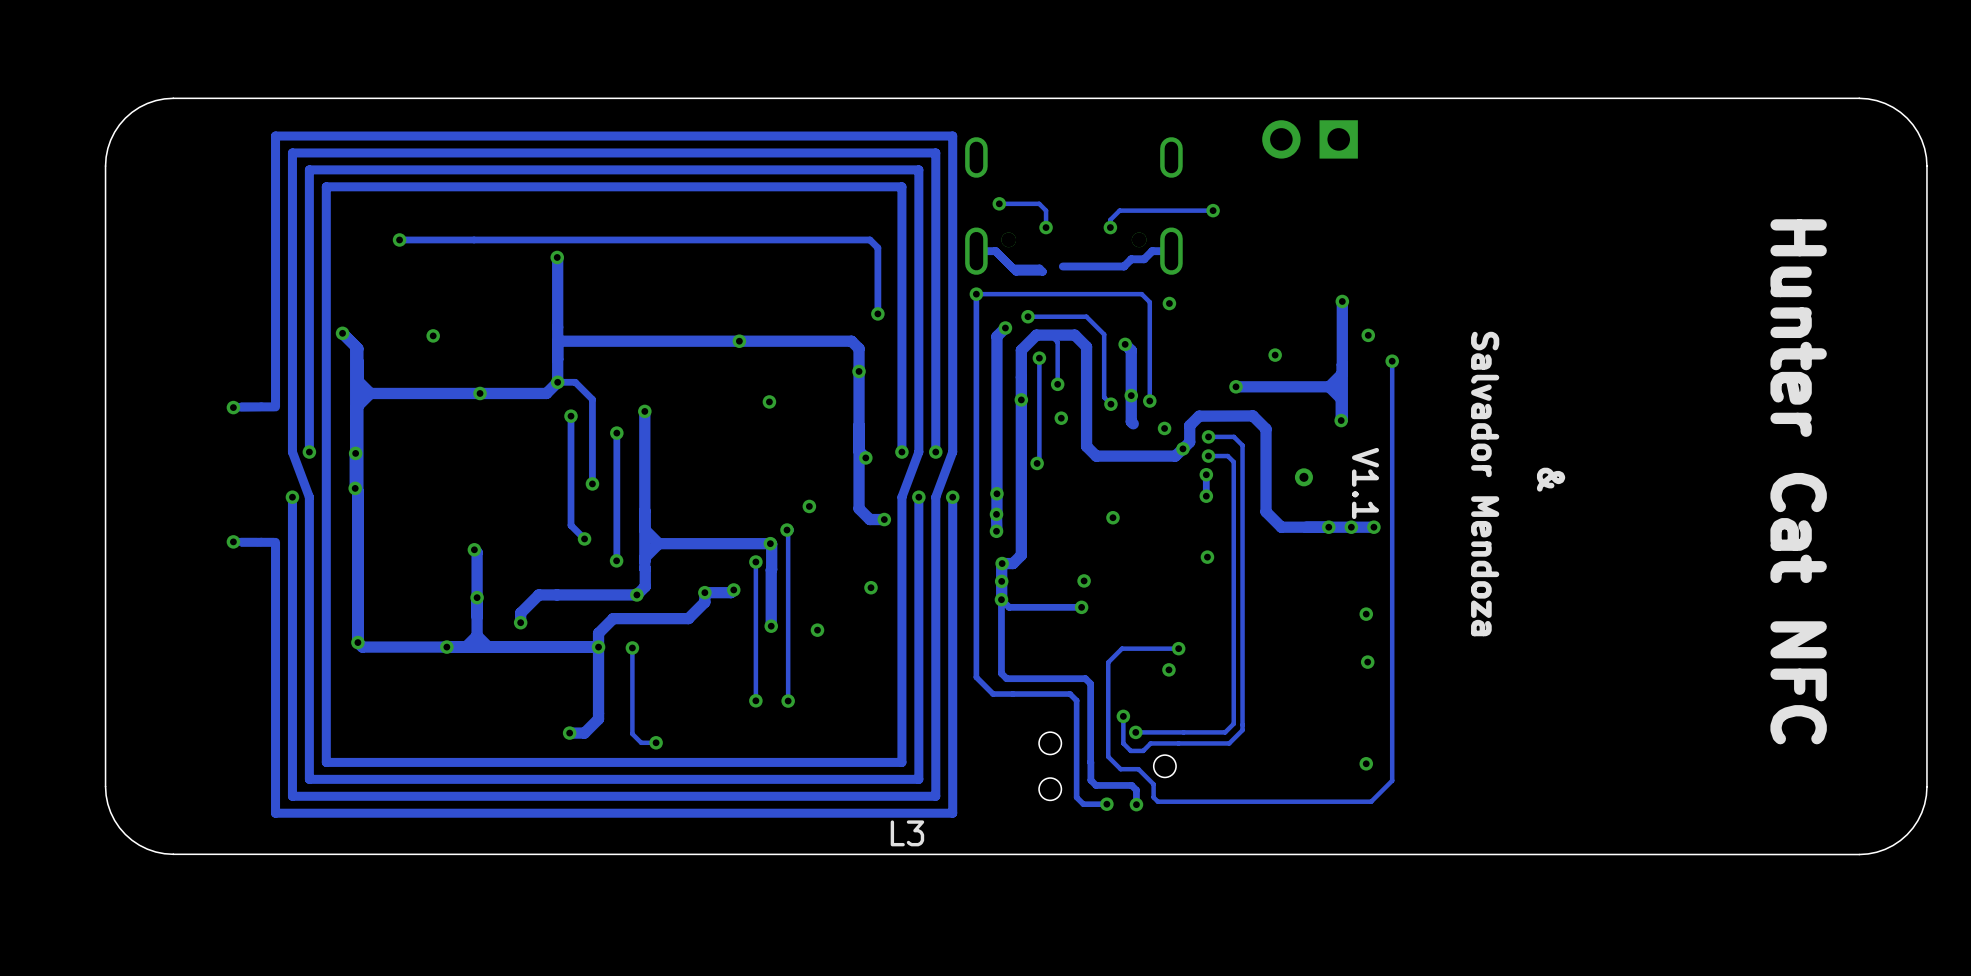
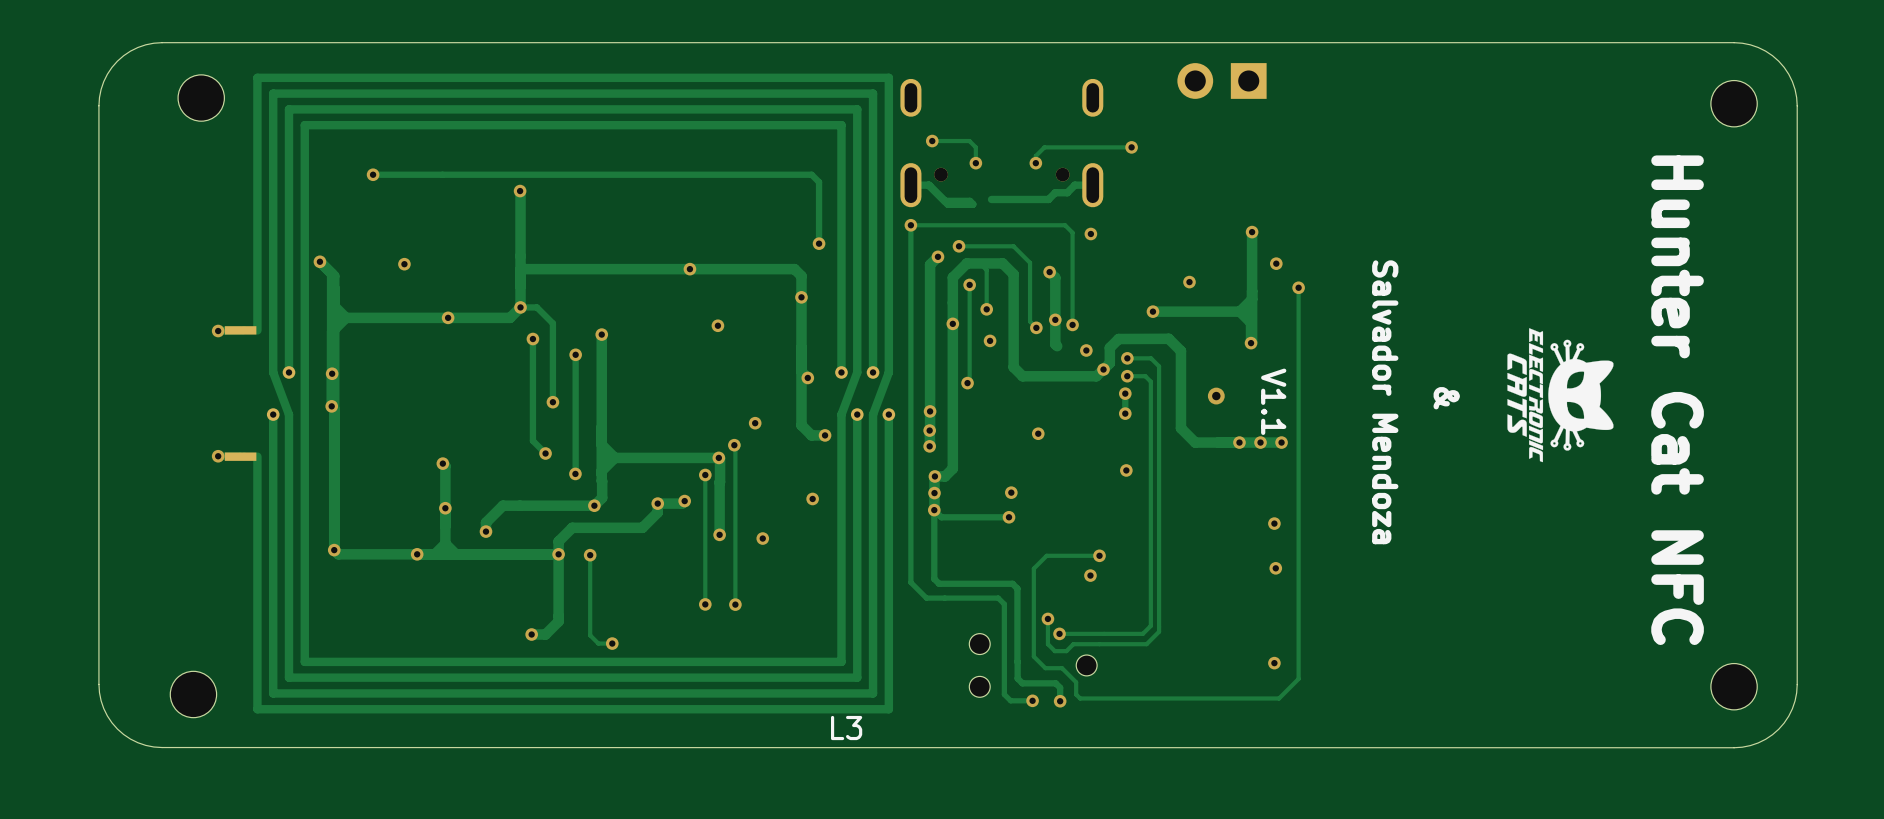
part: none -> (201, 98)
part: none -> (1734, 103)
drawing: none -> [1507, 328, 1614, 463]
part: none -> (1734, 686)
part: none -> (193, 694)

